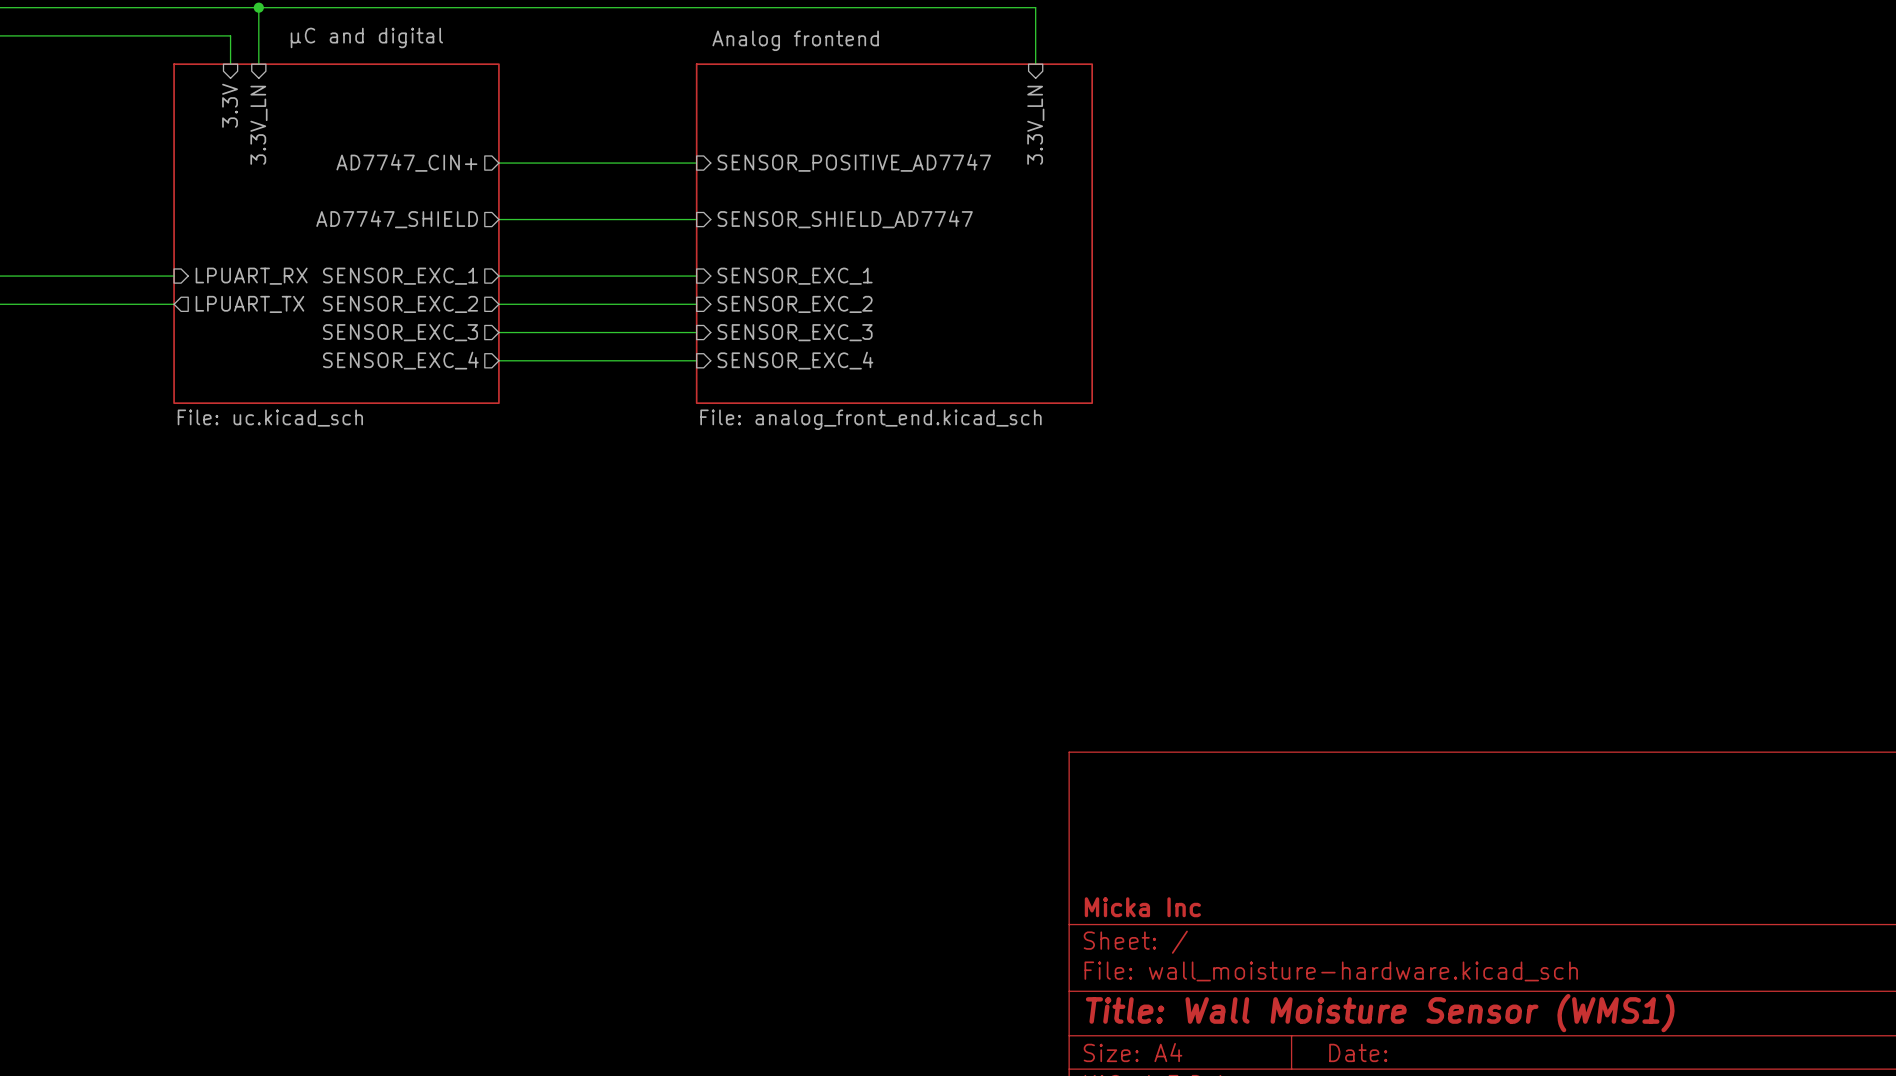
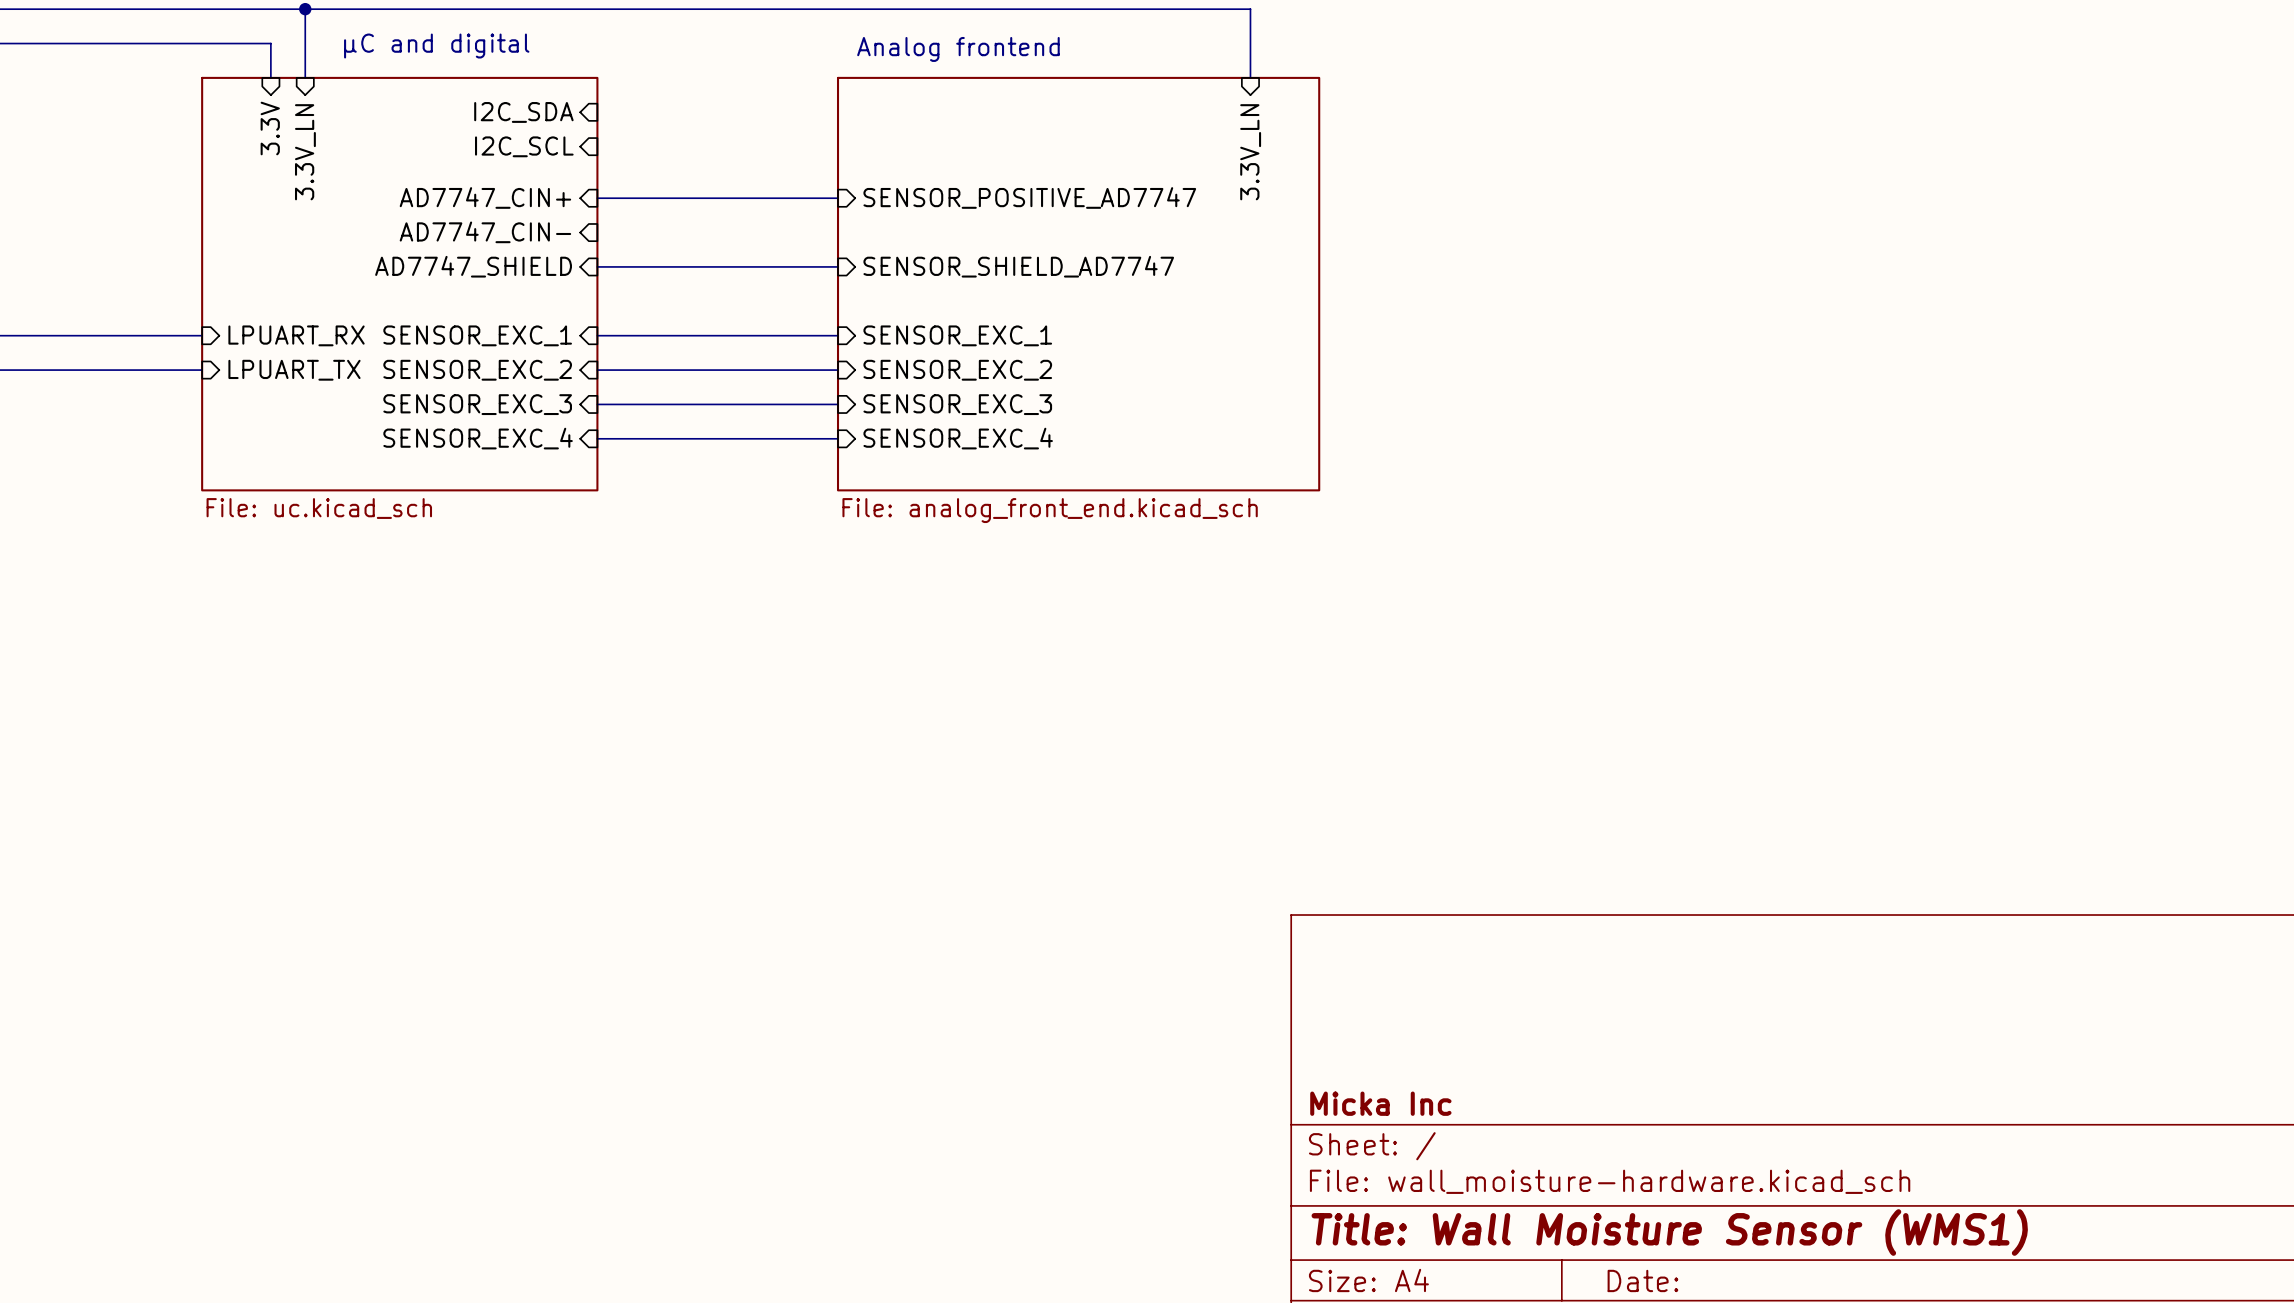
sheet pin: none -> I2C_SDA (523, 112)
sheet pin: none -> I2C_SCL (524, 146)
sheet pin shape: output (406, 162) -> input (485, 197)
sheet pin: none -> AD7747_CIN- (485, 232)
sheet pin shape: output (397, 219) -> input (473, 266)
sheet pin shape: output (400, 276) -> input (477, 335)
sheet pin shape: output (249, 304) -> input (294, 370)
sheet pin shape: output (400, 304) -> input (477, 370)
sheet pin shape: output (400, 332) -> input (477, 404)
sheet pin shape: output (400, 360) -> input (478, 438)

